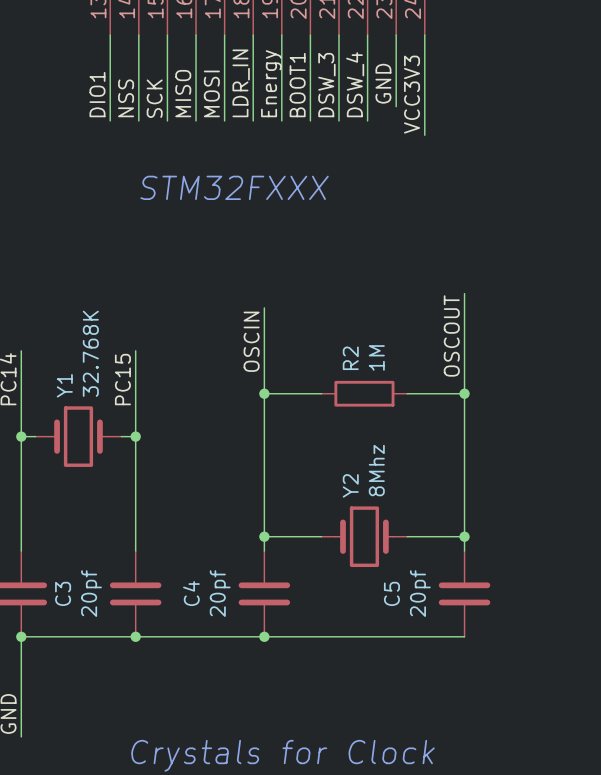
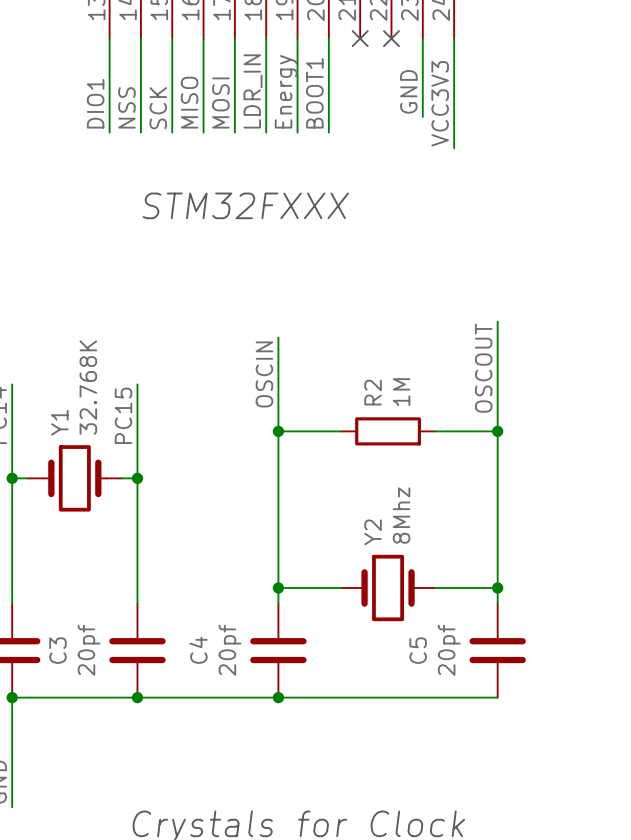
wire: (339, 35) (339, 120) -> none
no-connect mark: none -> (360, 38)
wire: (367, 35) (367, 120) -> none
no-connect mark: none -> (391, 38)
label: DSW_4 (355, 84) -> none
label: DSW_3 (326, 85) -> none

